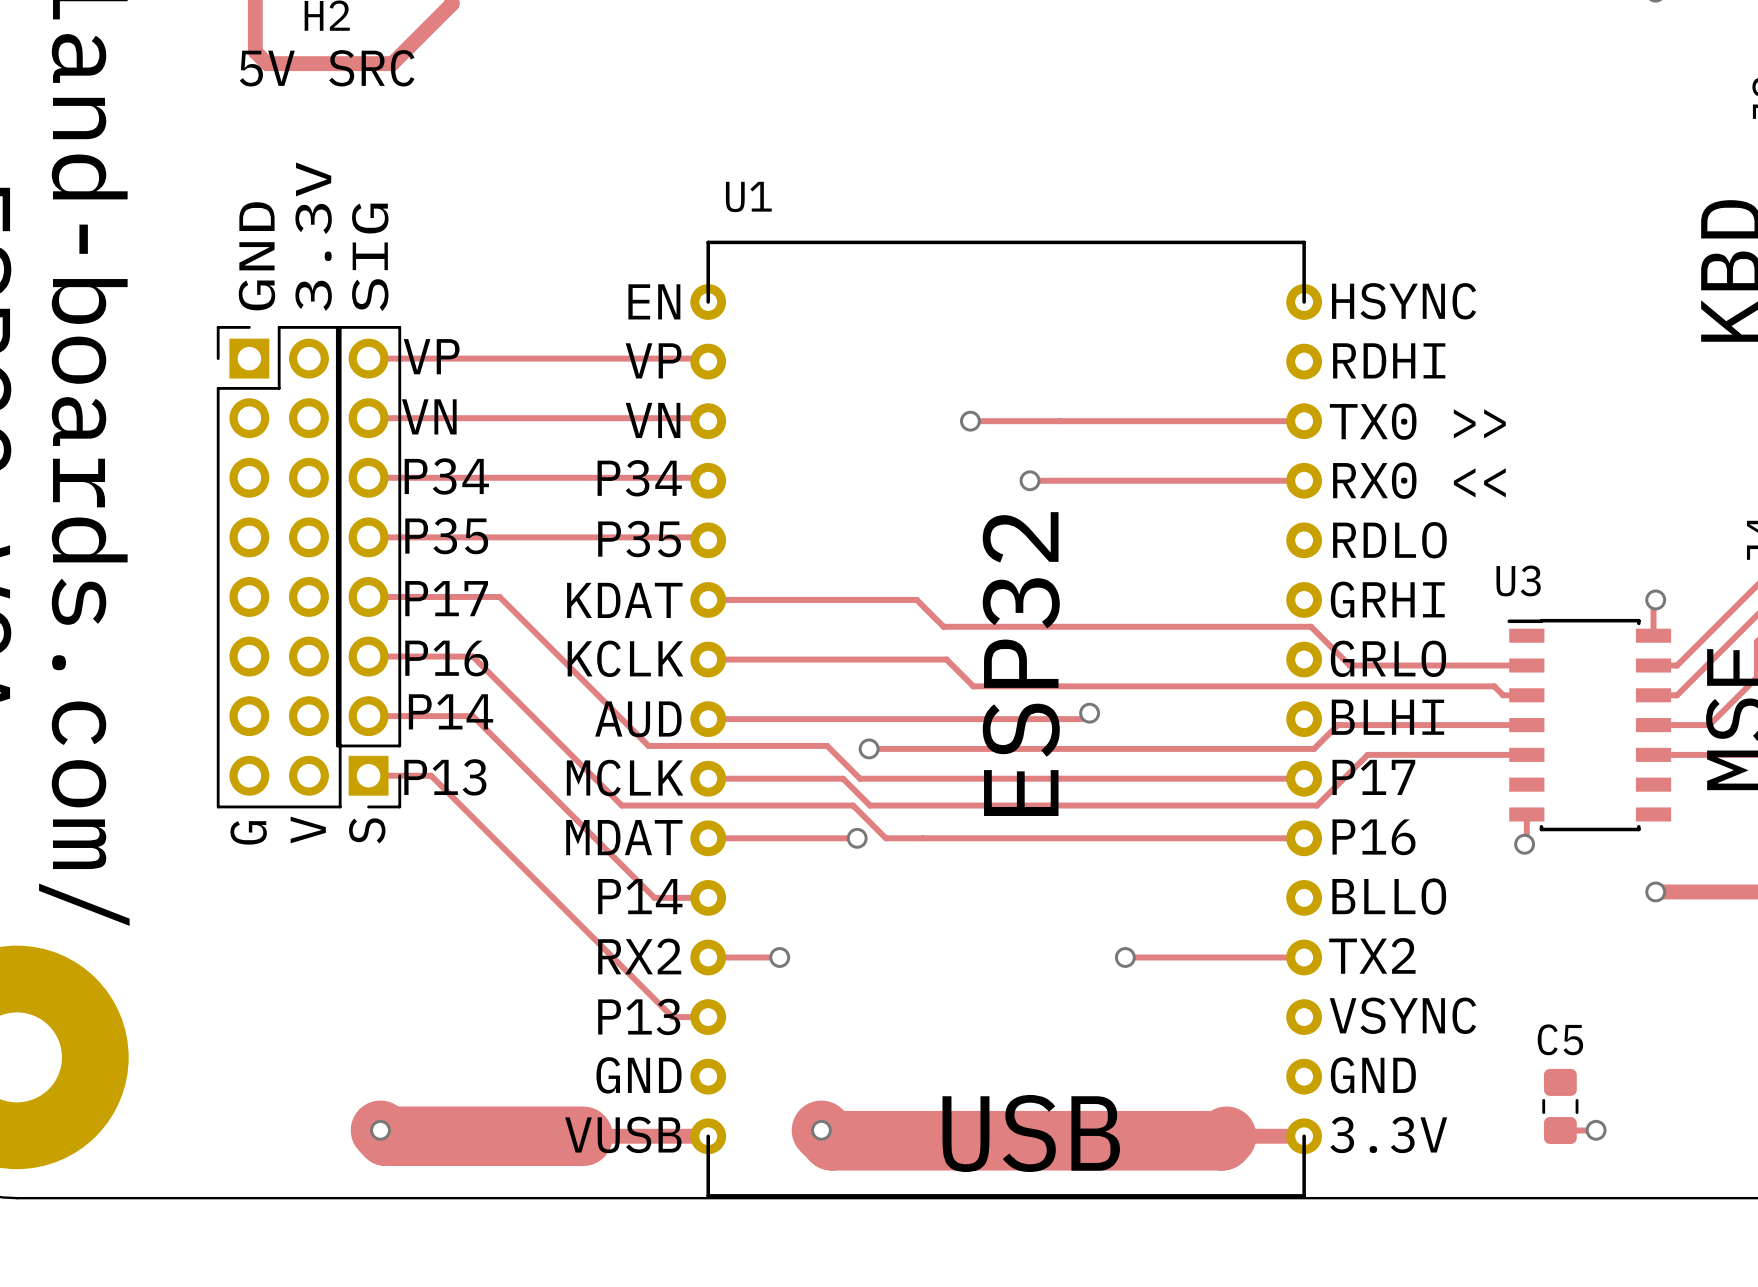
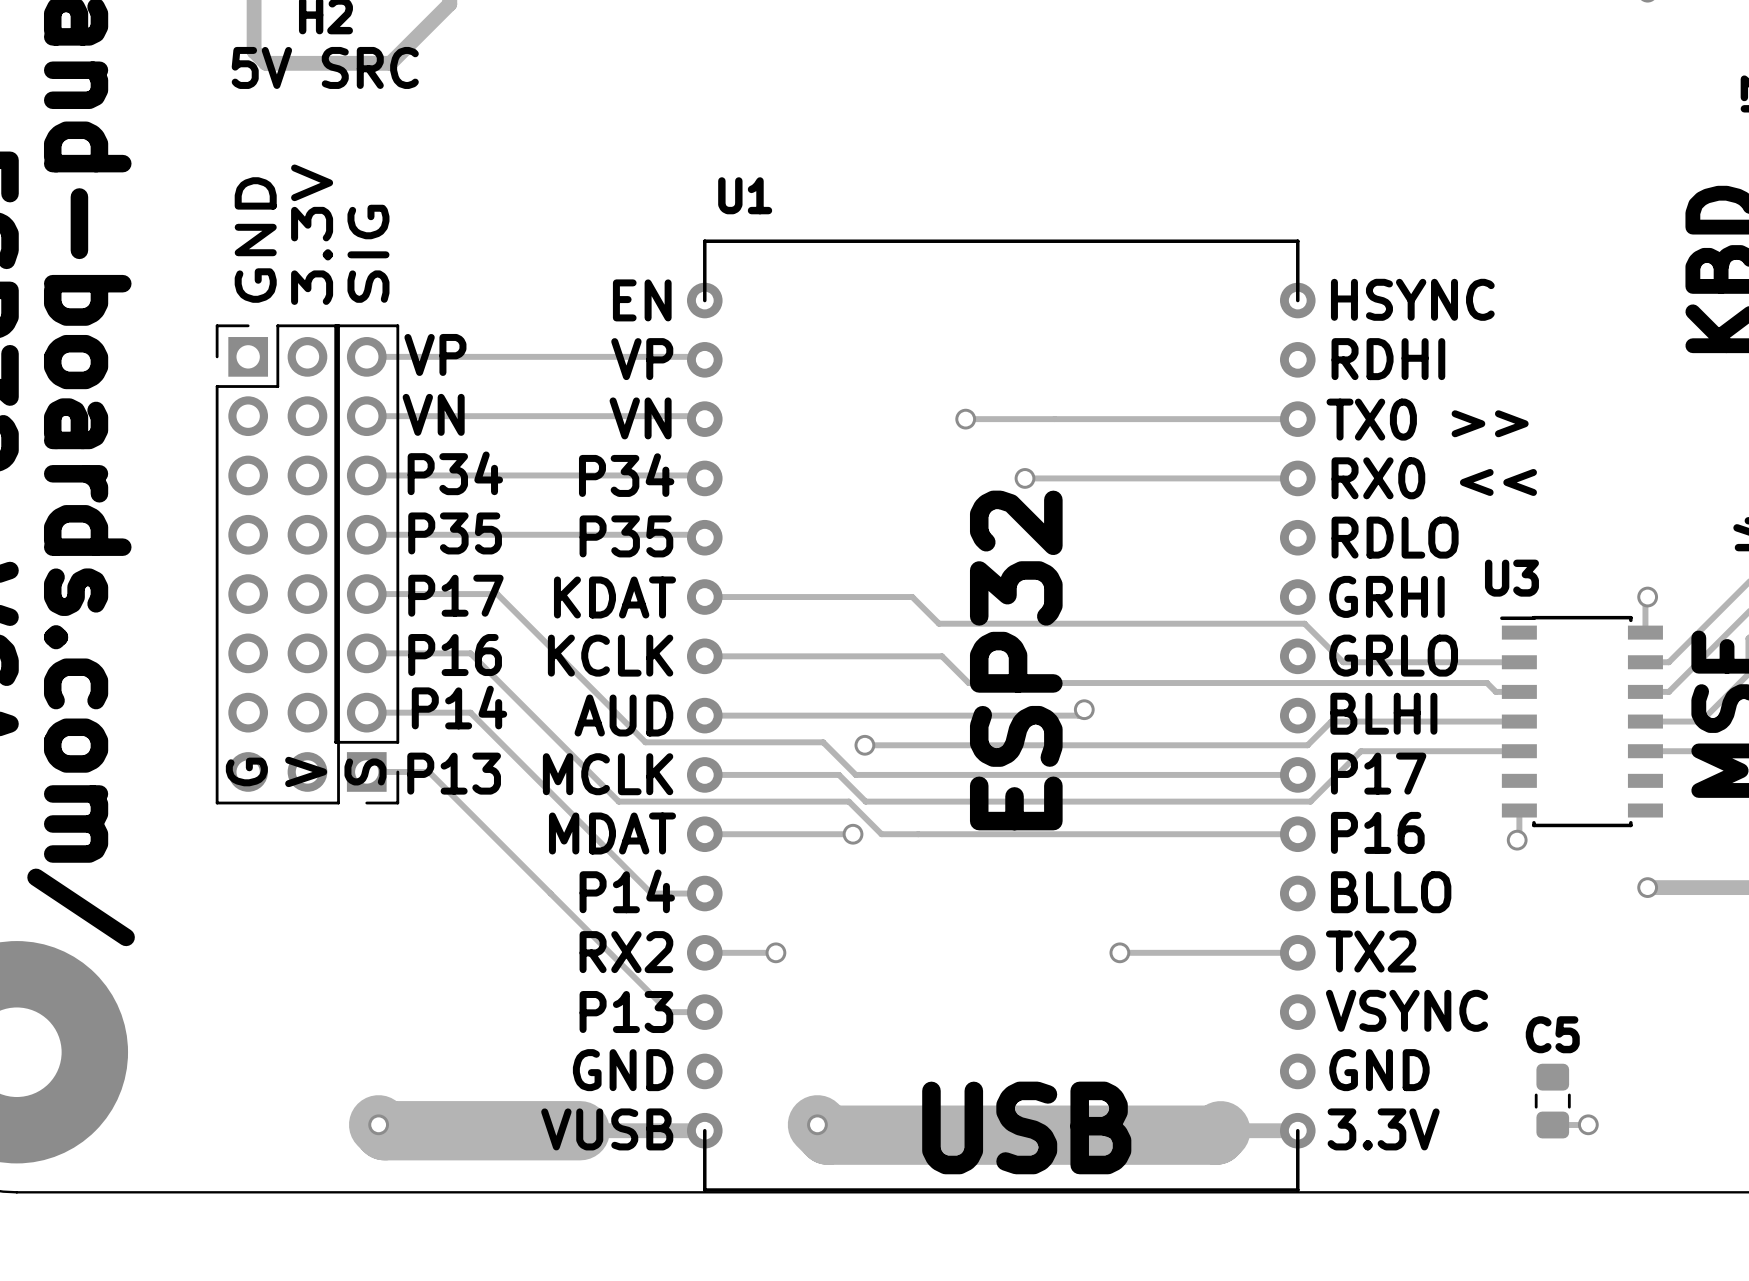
text position: V (308, 829) -> V (306, 771)
text position: S (367, 830) -> S (365, 771)
text position: G (248, 832) -> G (246, 771)

